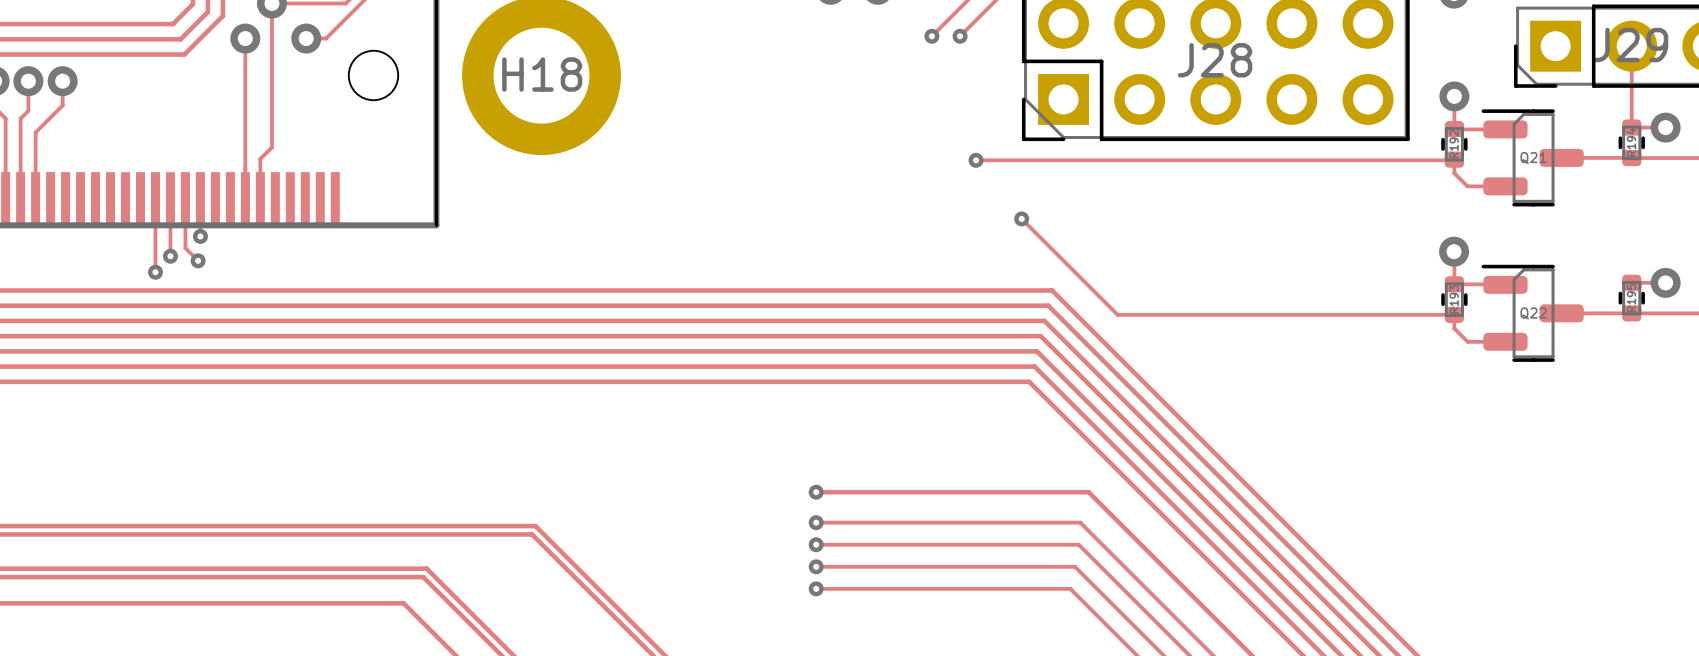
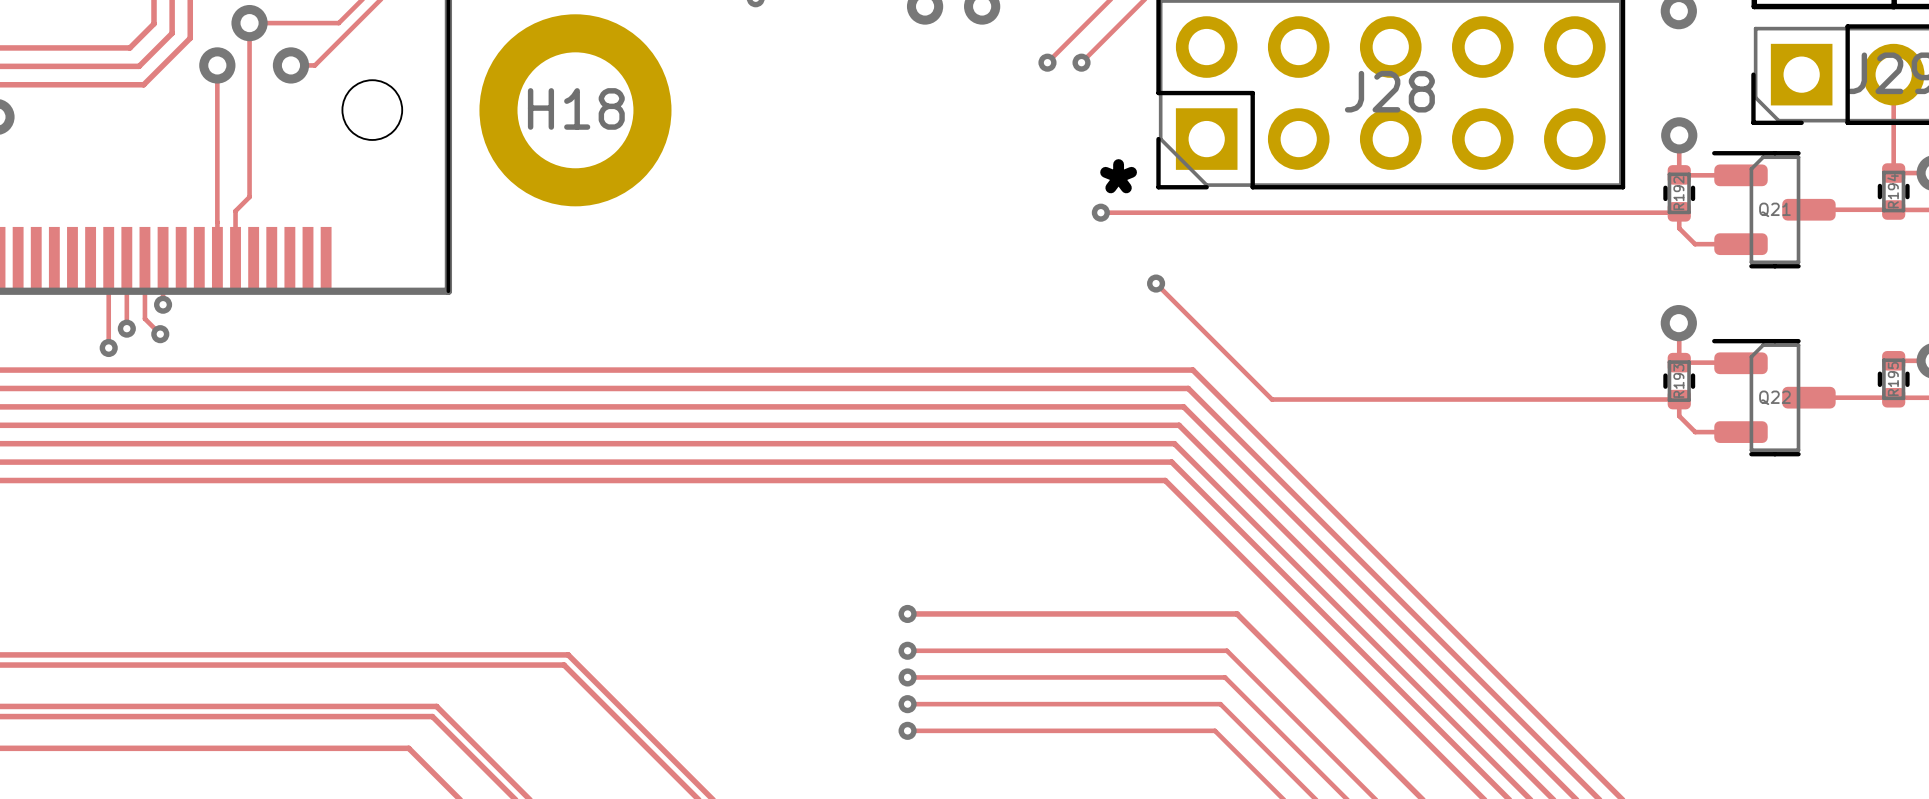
text: none -> * (1118, 176)

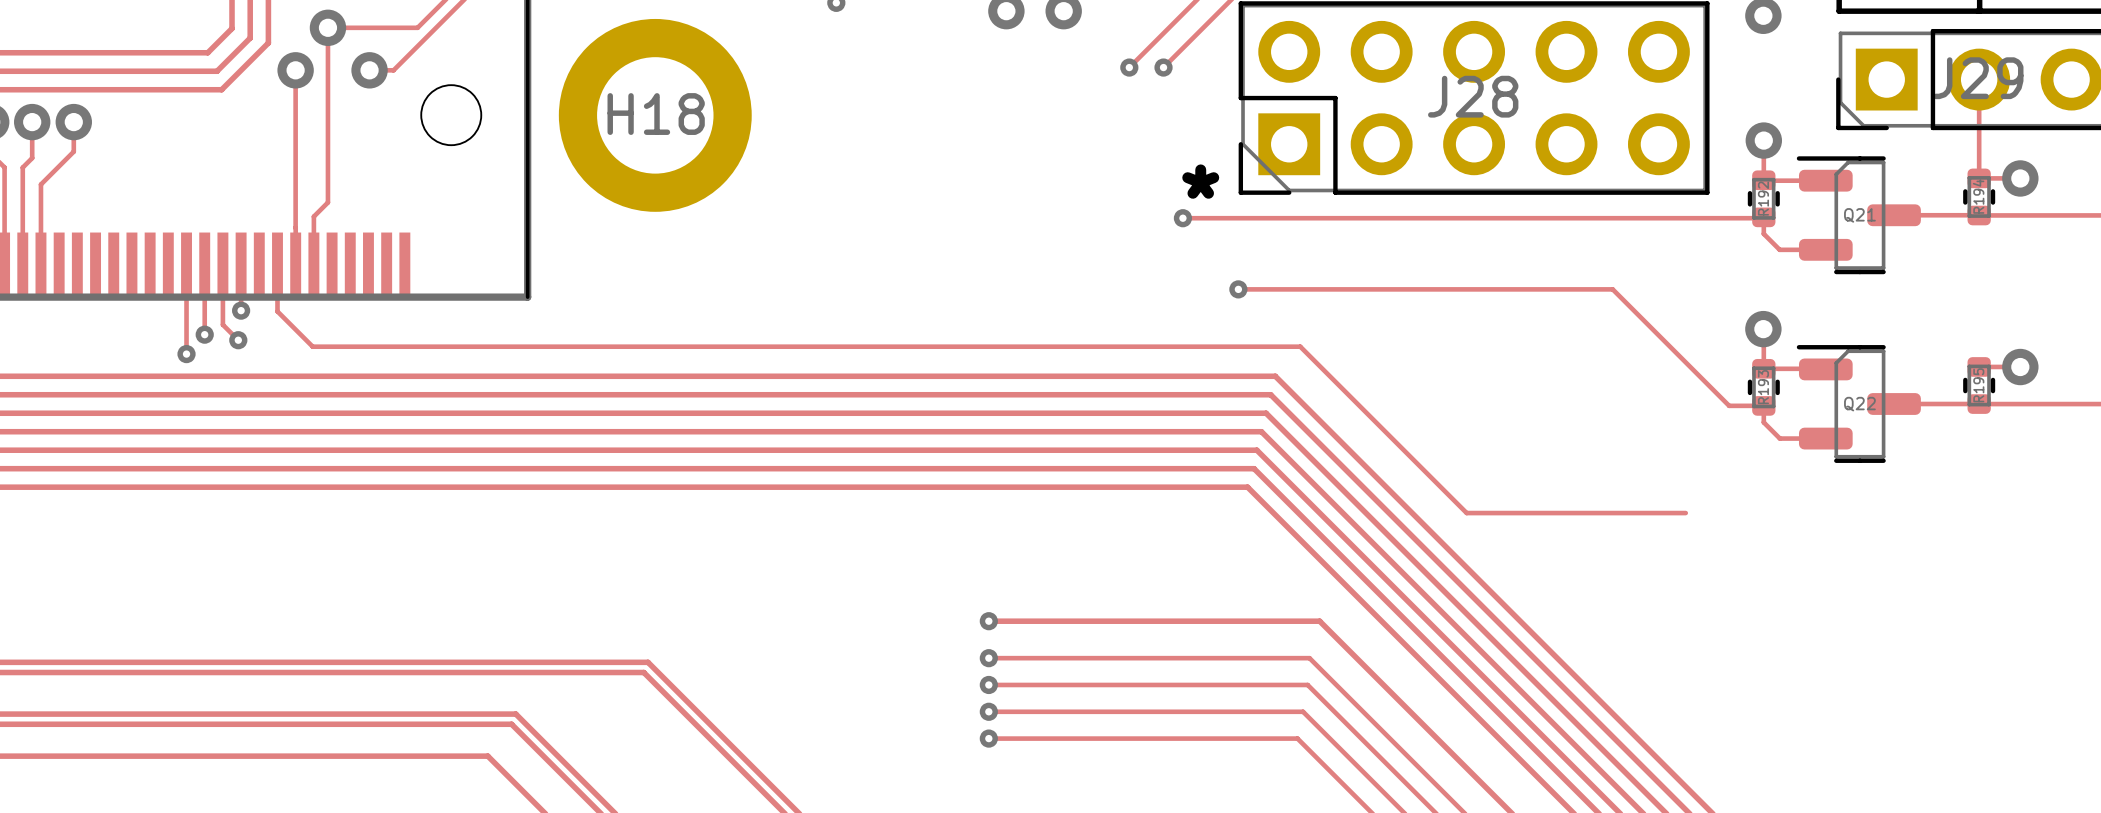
track: none -> (277, 264) (277, 311) (312, 346) (1300, 346) (1466, 513) (1685, 513)
track: (1156, 283) (1272, 399) (1644, 399) -> (1238, 289) (1612, 289) (1729, 405)

